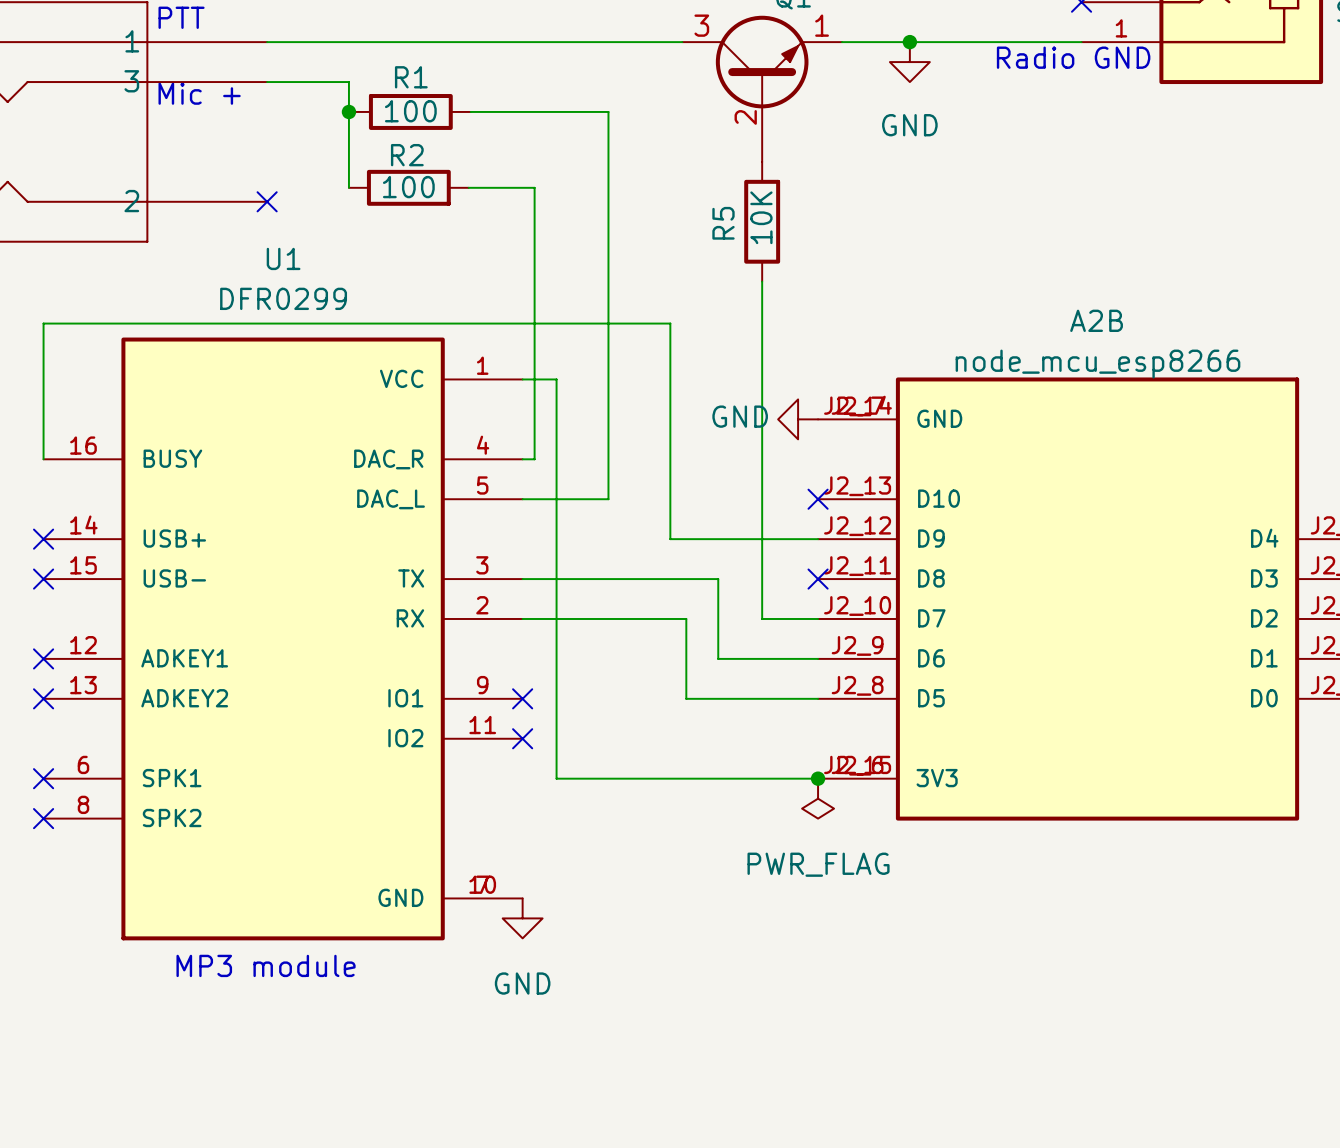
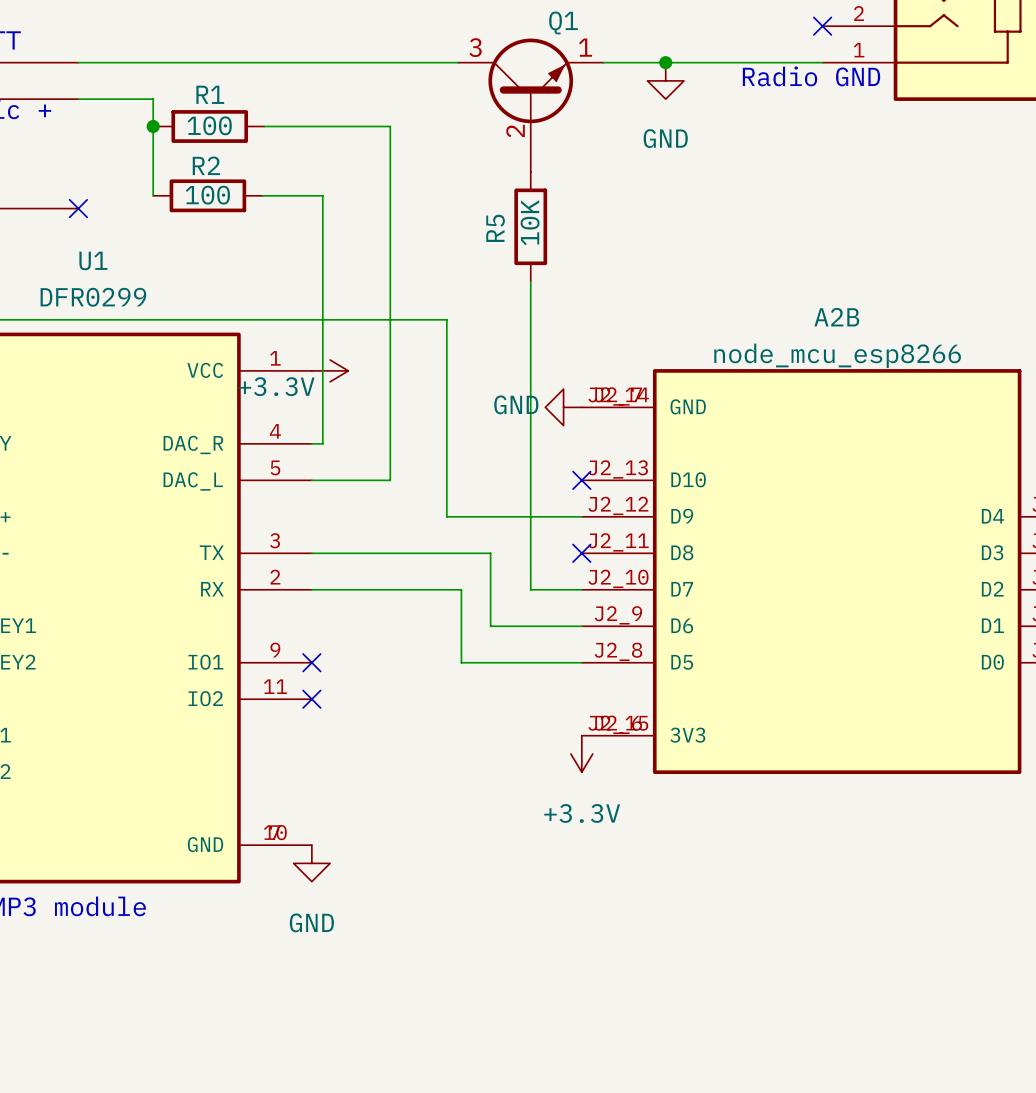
wire: (522, 379) (556, 379) (556, 778) (818, 778) -> none
power symbol: none -> +3.3V (330, 370)
junction: (818, 778) -> none
power symbol: PWR_FLAG (818, 798) -> +3.3V (581, 753)

